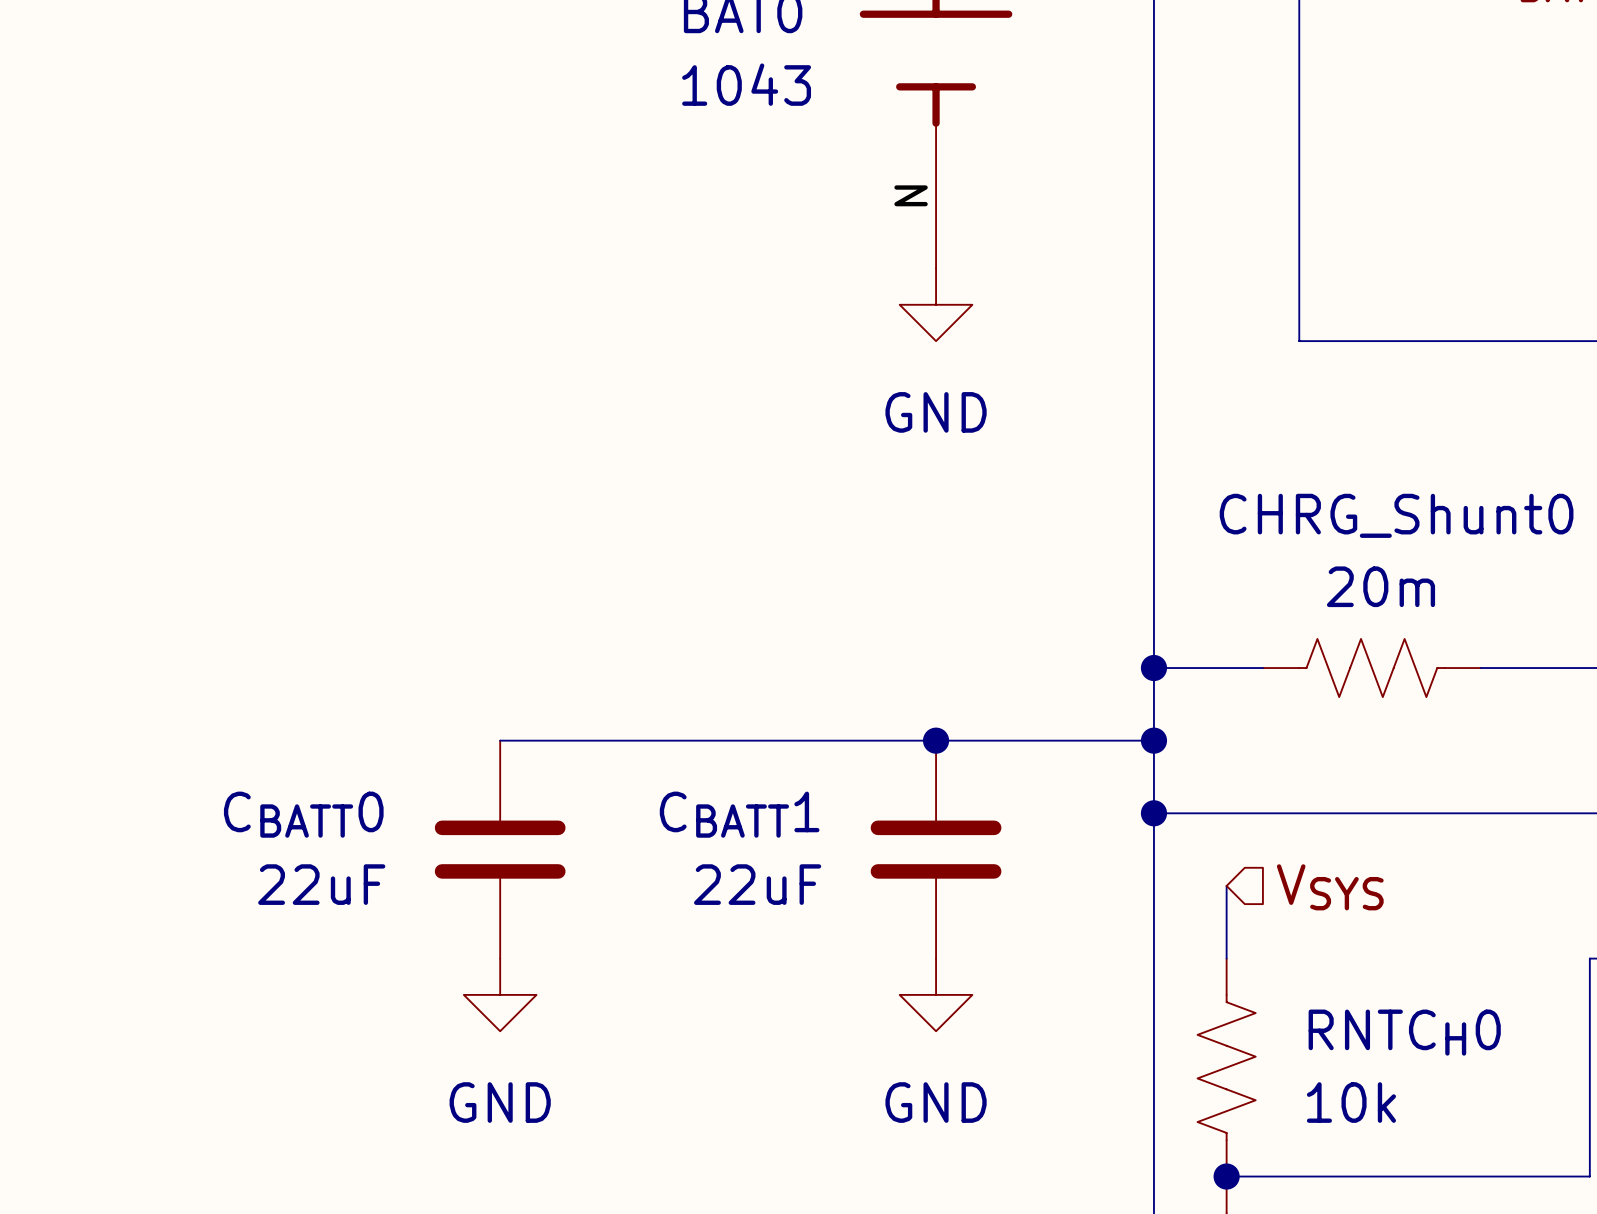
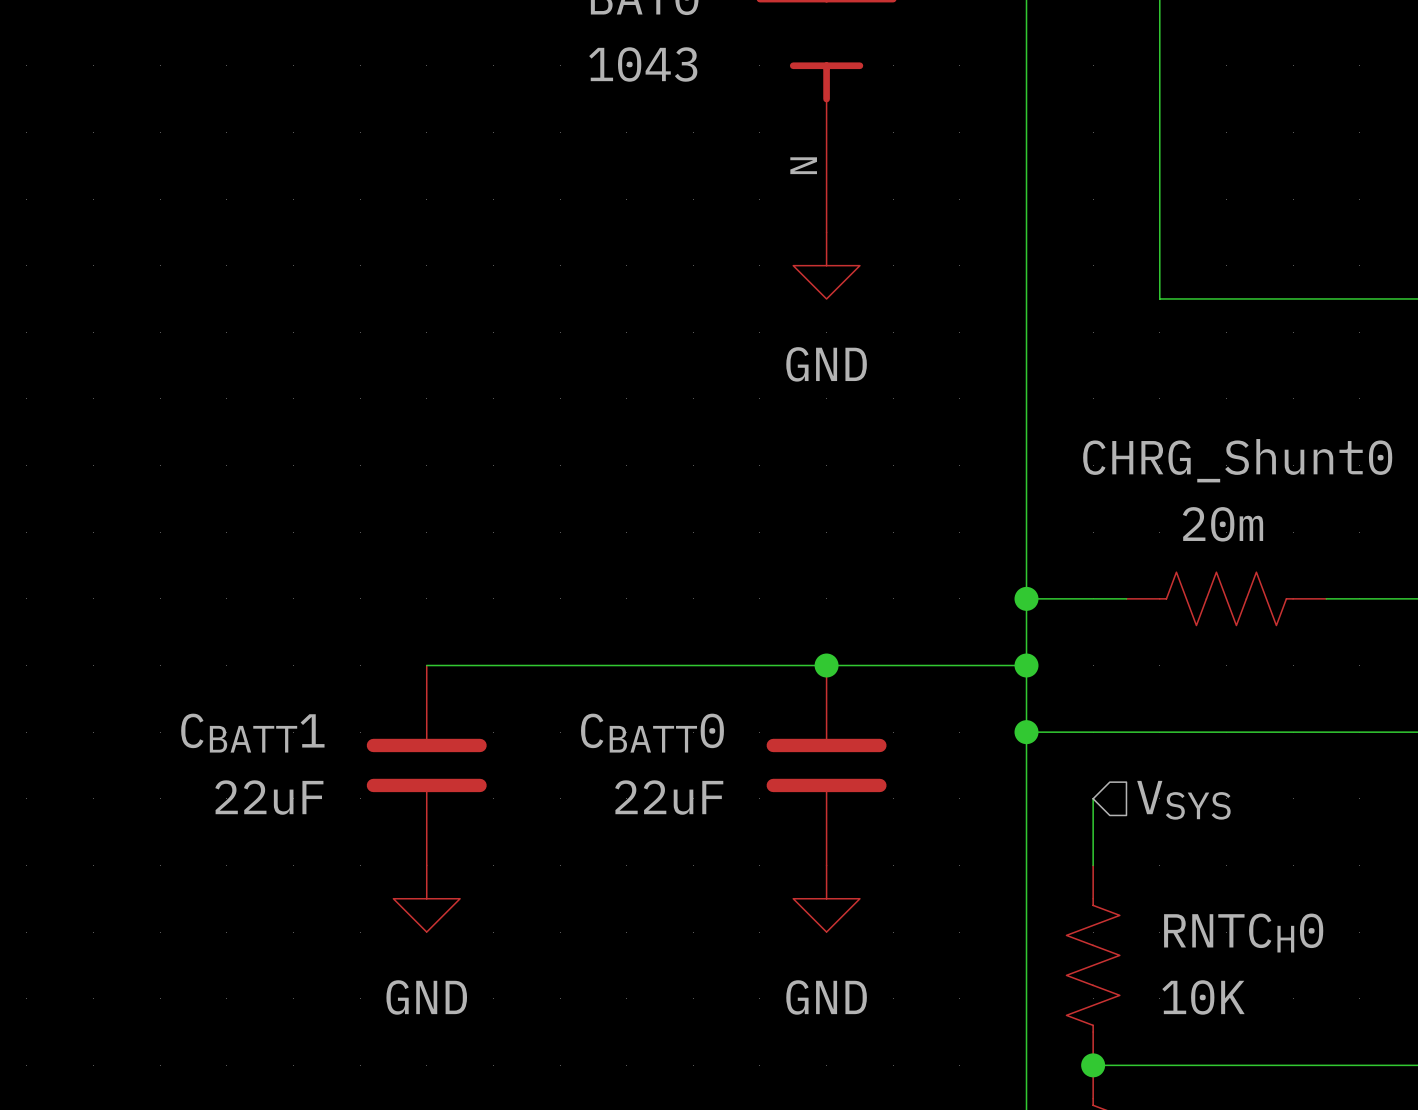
CBATT0 name: CBATT0 (303, 814) -> CBATT1 (252, 733)
CBATT1 name: CBATT1 (739, 814) -> CBATT0 (652, 733)
RNTCH0 value: 10k (1351, 1102) -> 10K (1203, 997)

